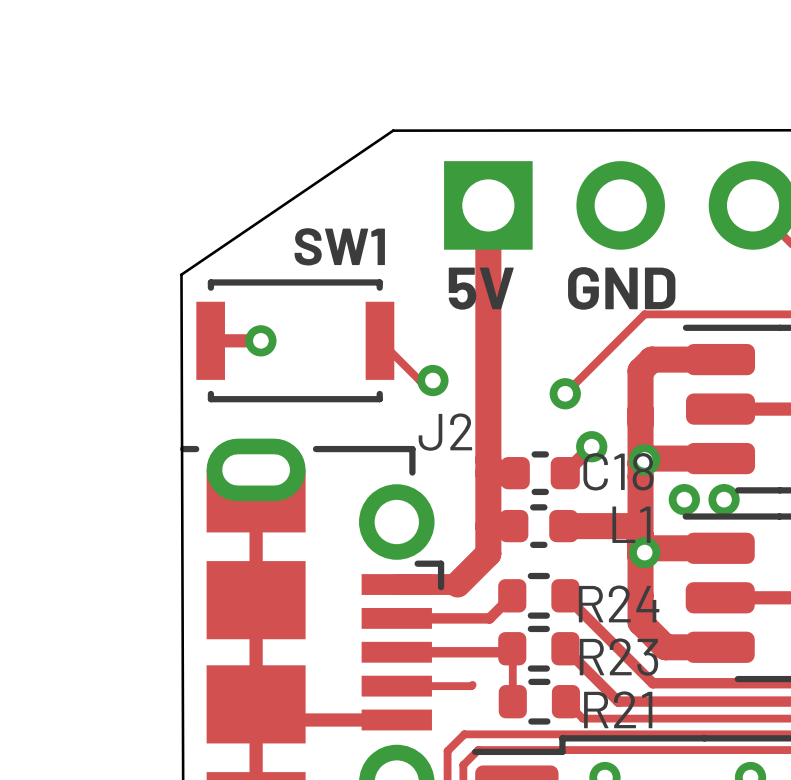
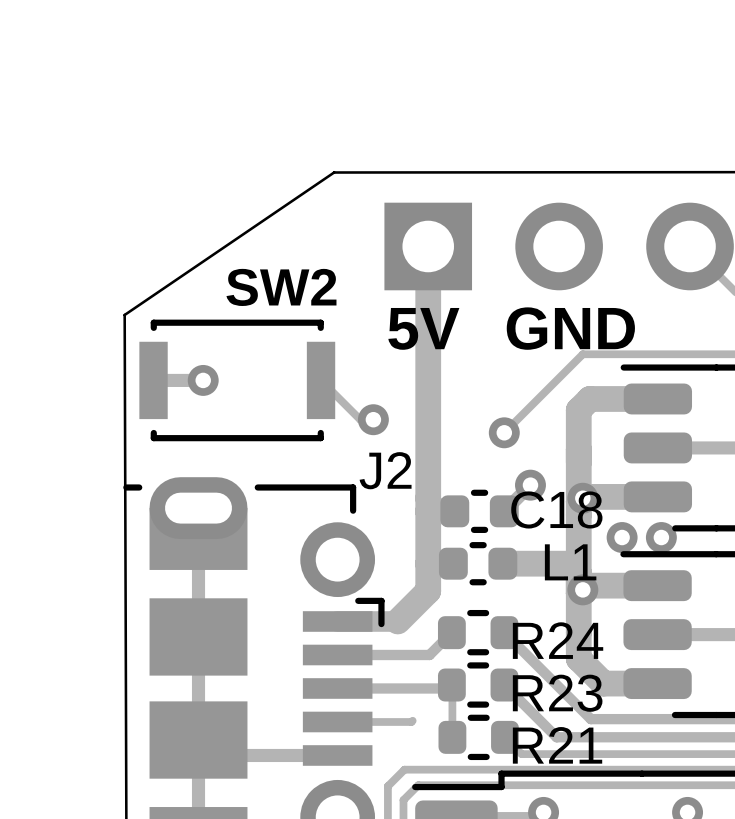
SW1 name: SW1 (339, 246) -> SW2 (281, 287)

